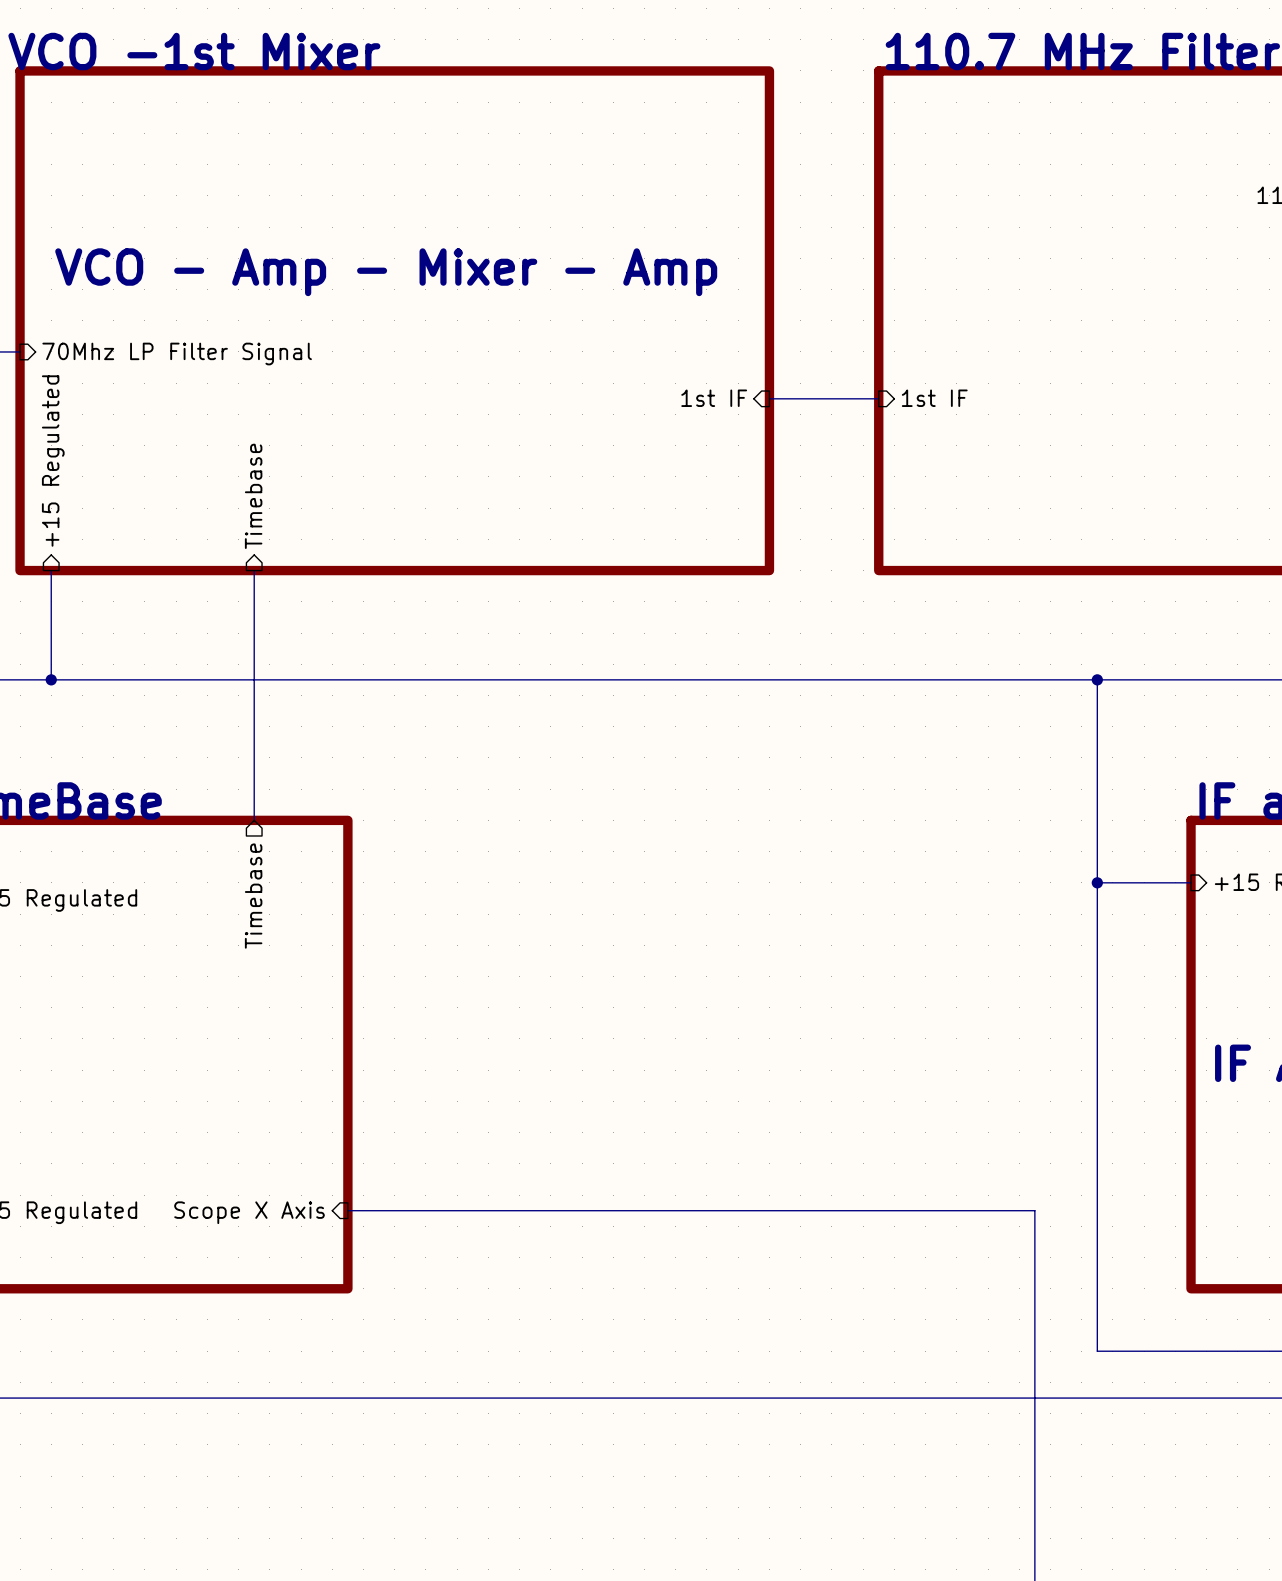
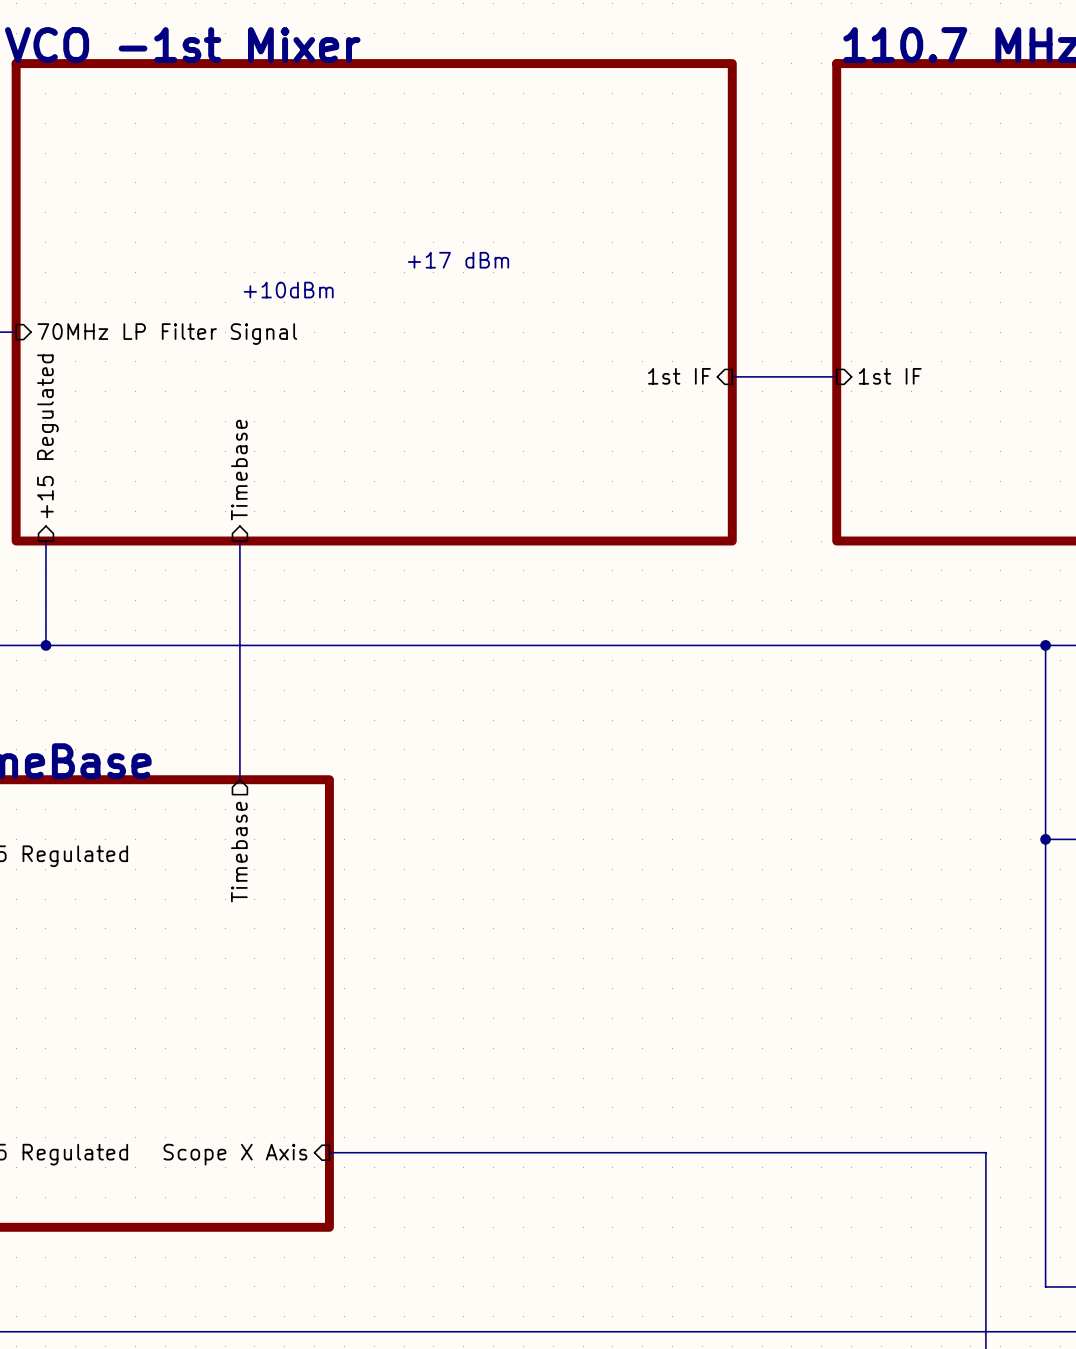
text: VCO - Amp - Mixer - Amp (386, 272) -> none
text: none -> +17 dBm (458, 260)
text: none -> +10dBm (288, 290)
sheet pin: 70Mhz LP Filter Signal (177, 354) -> 70MHz LP Filter Signal (167, 334)

